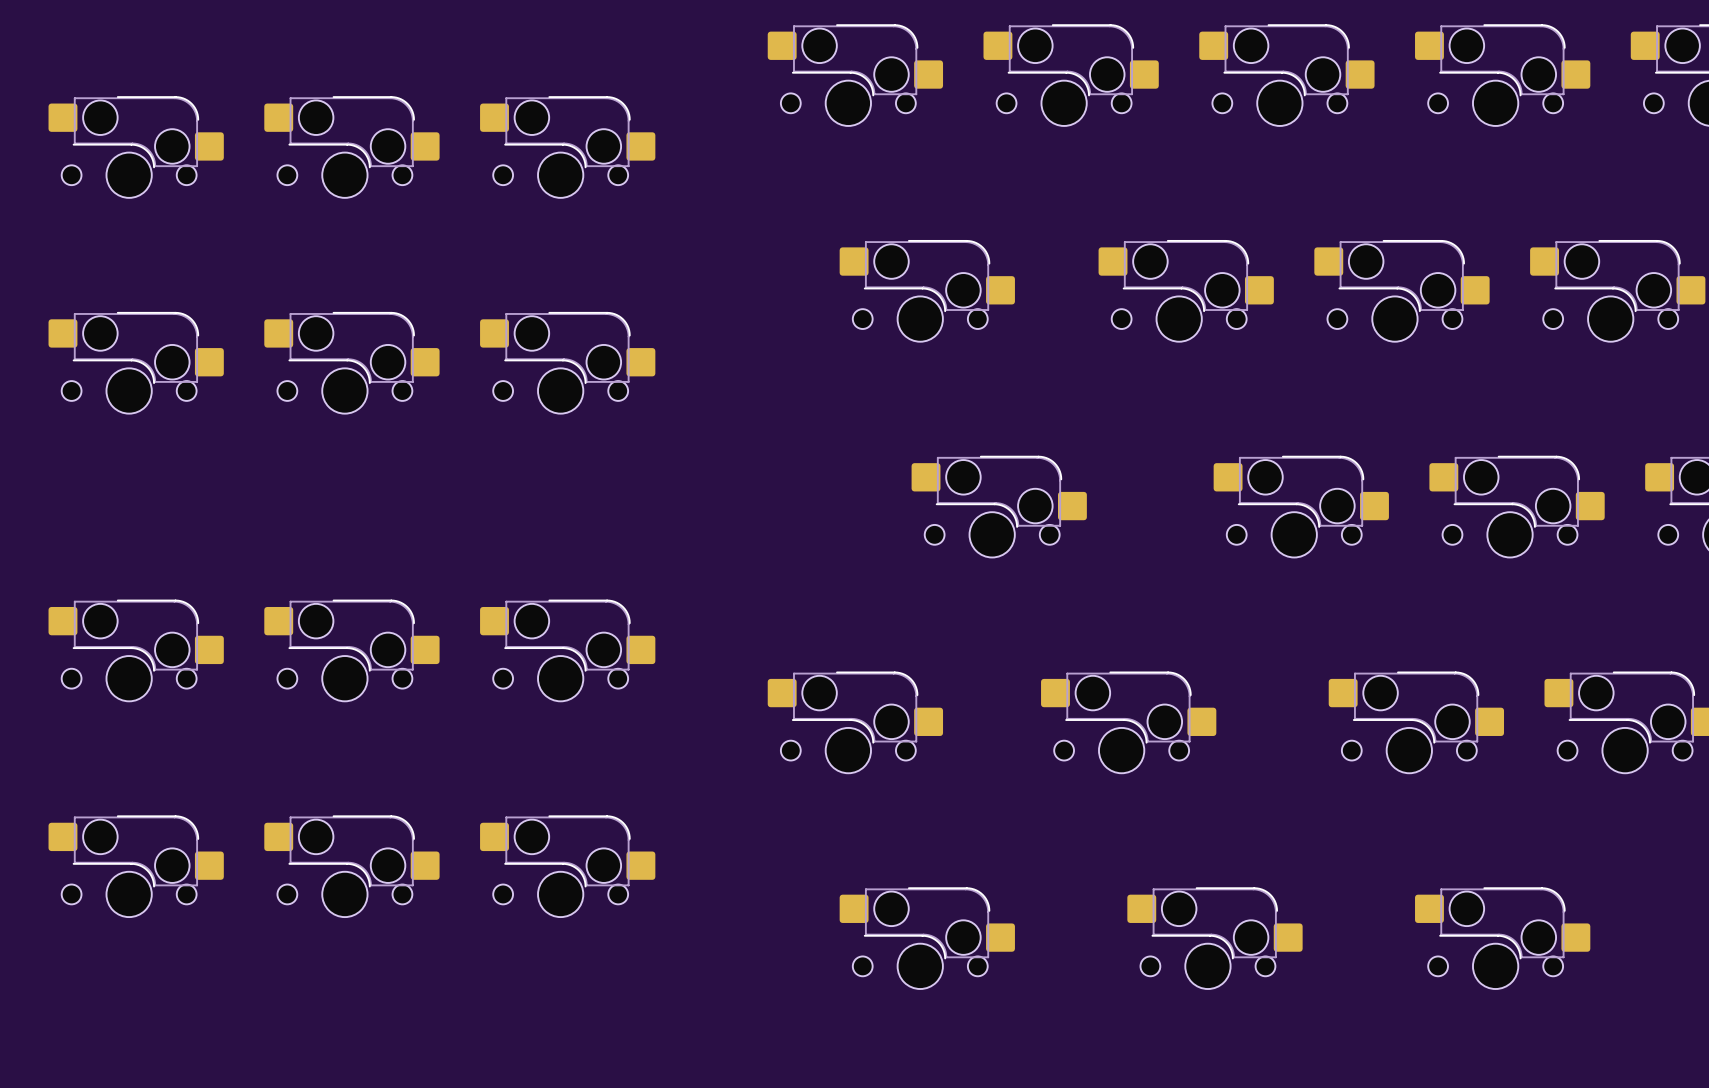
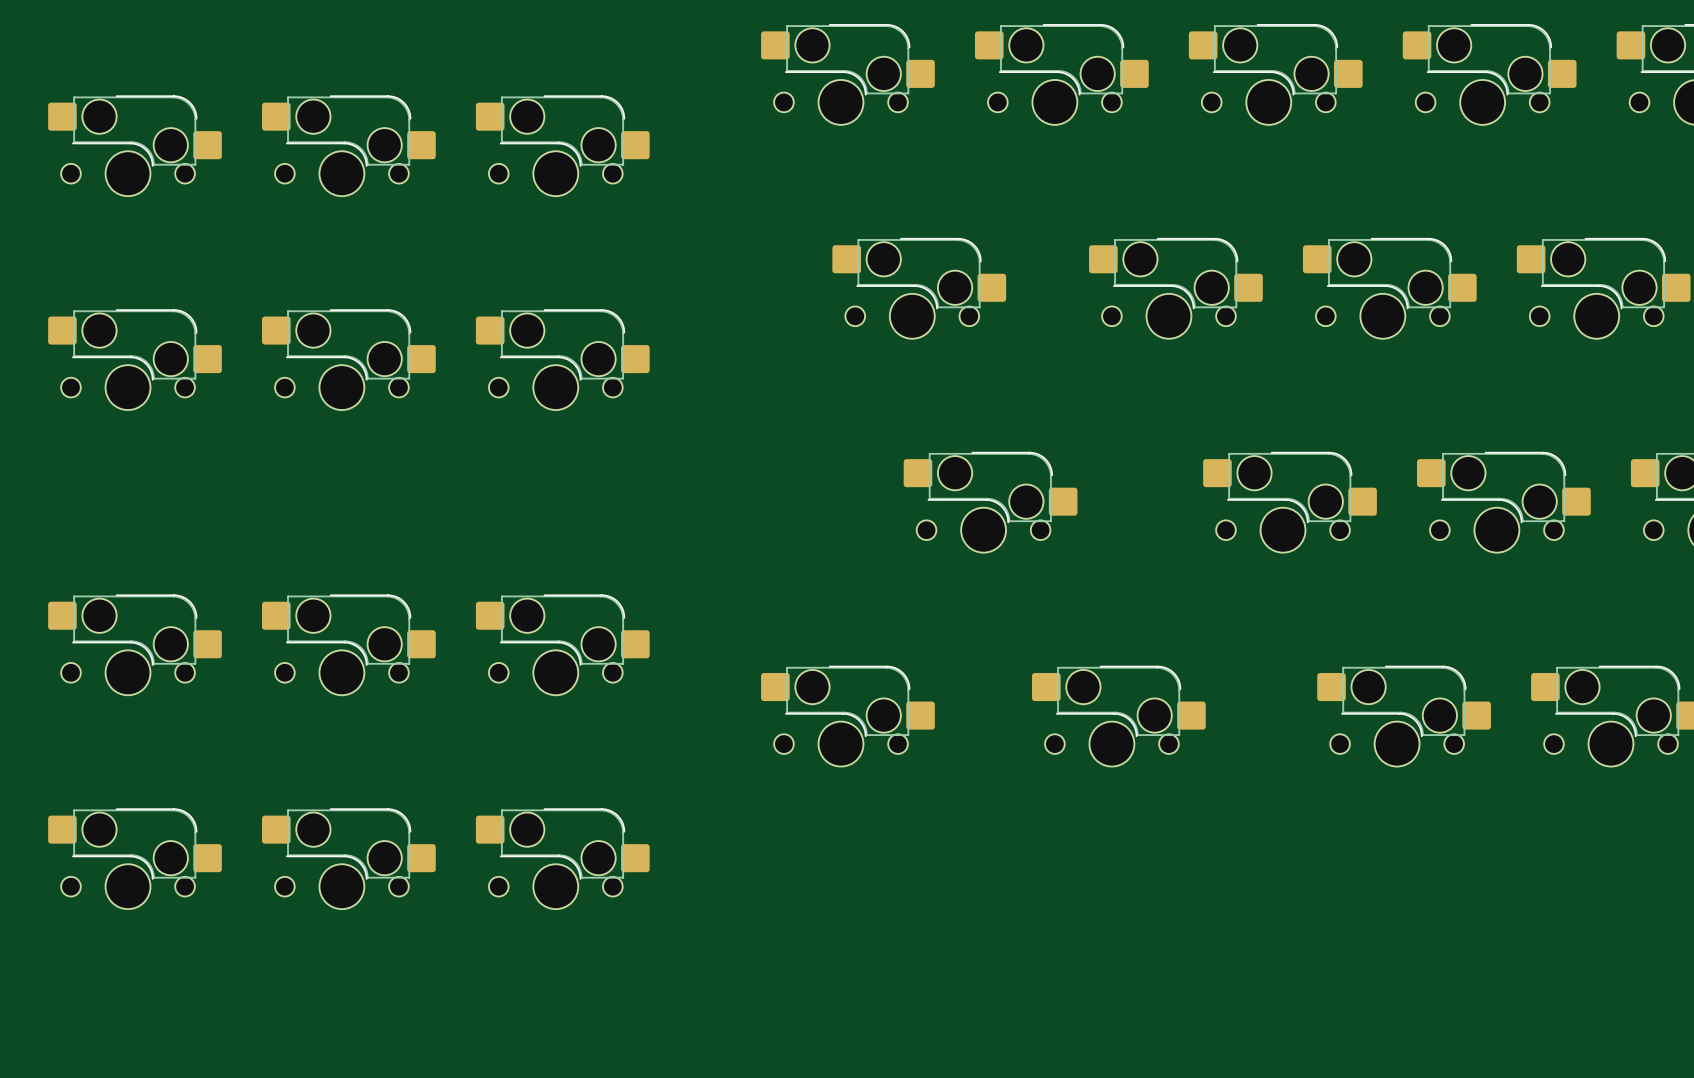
part: (927, 938) -> none
part: (1214, 938) -> none
part: (1502, 938) -> none

